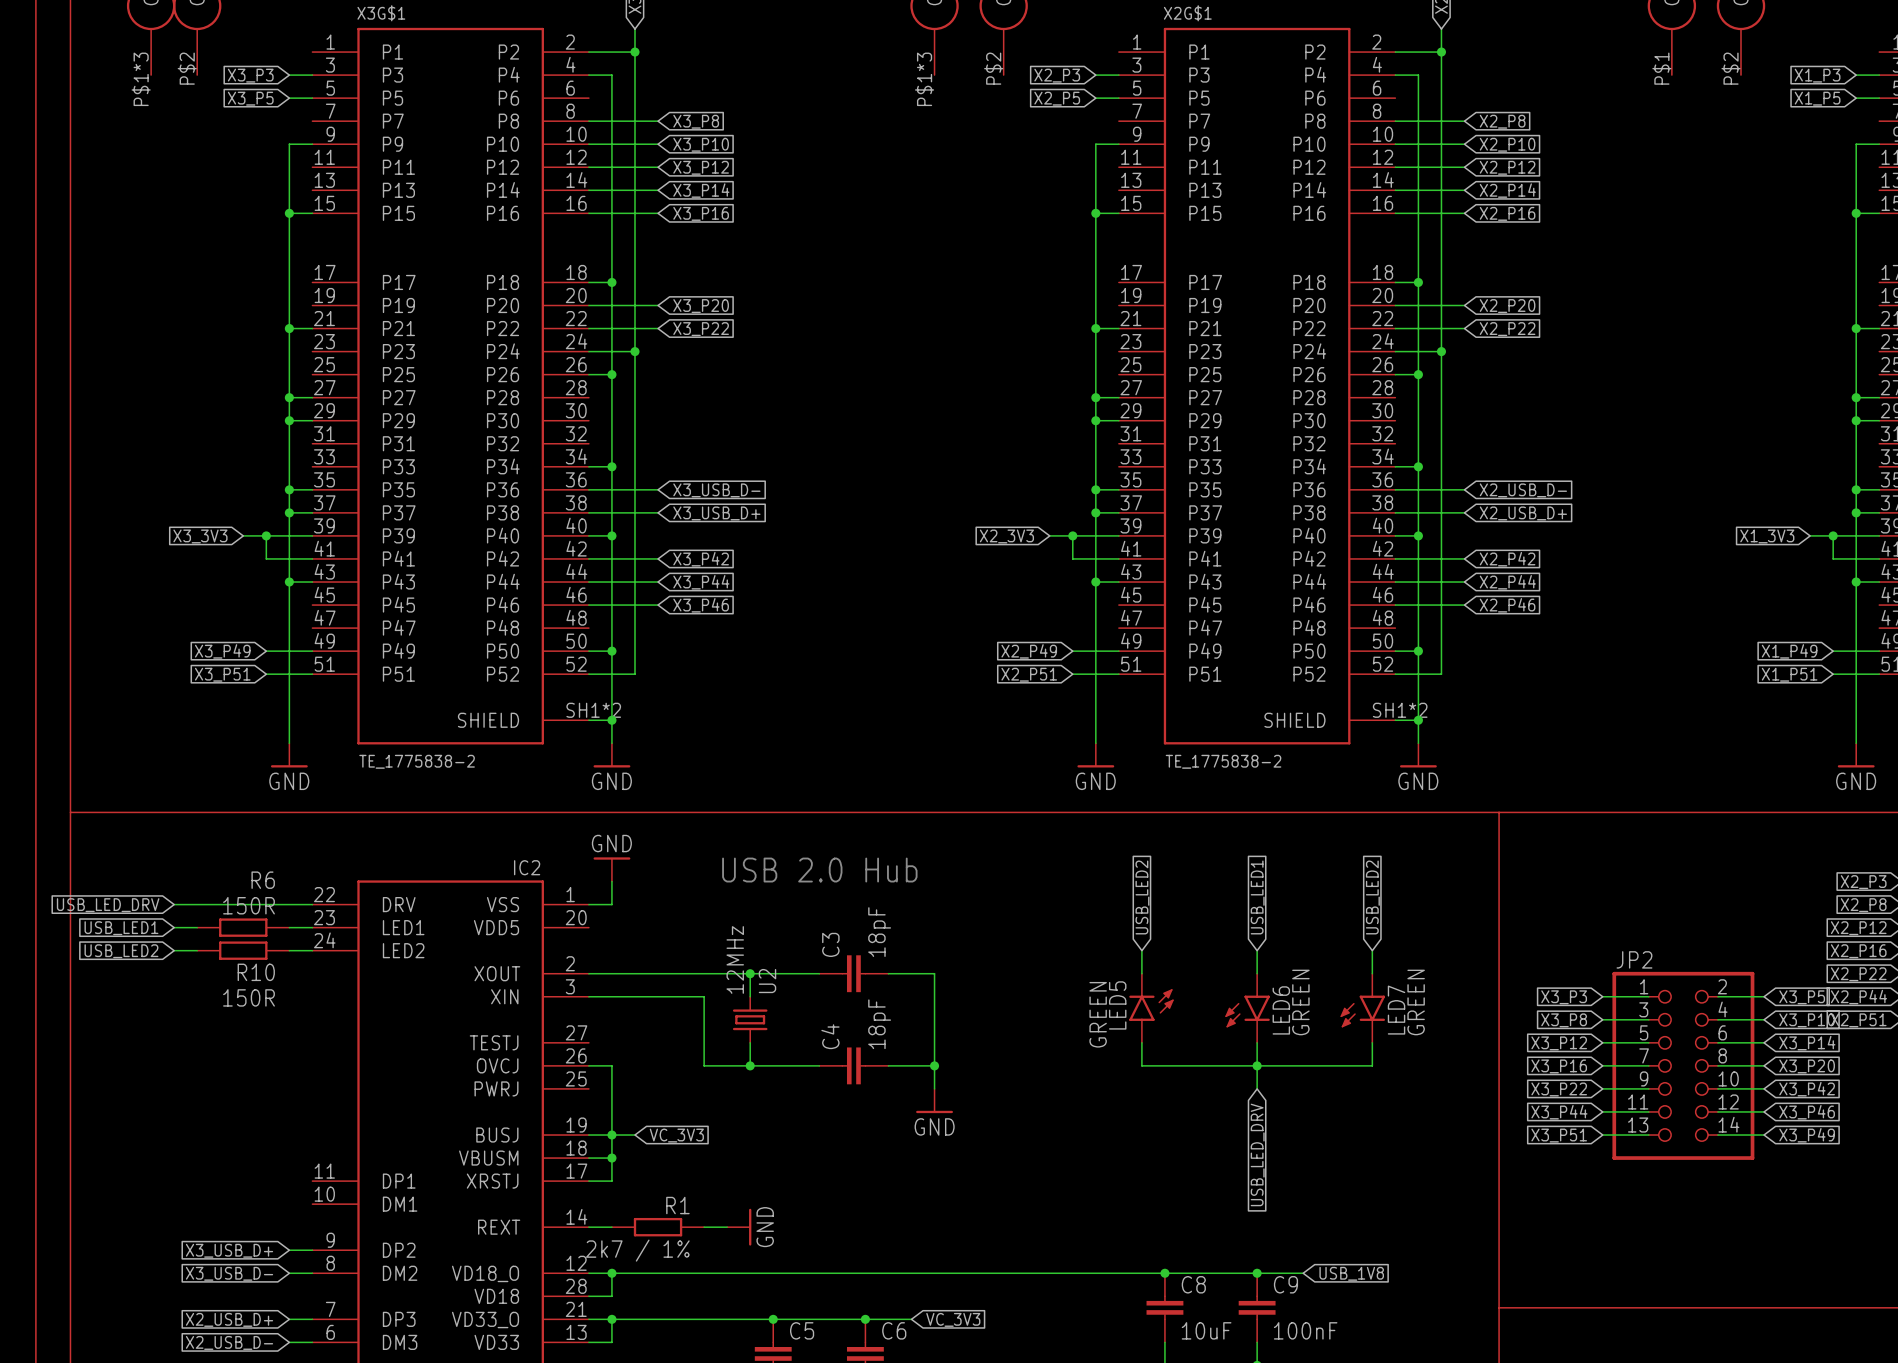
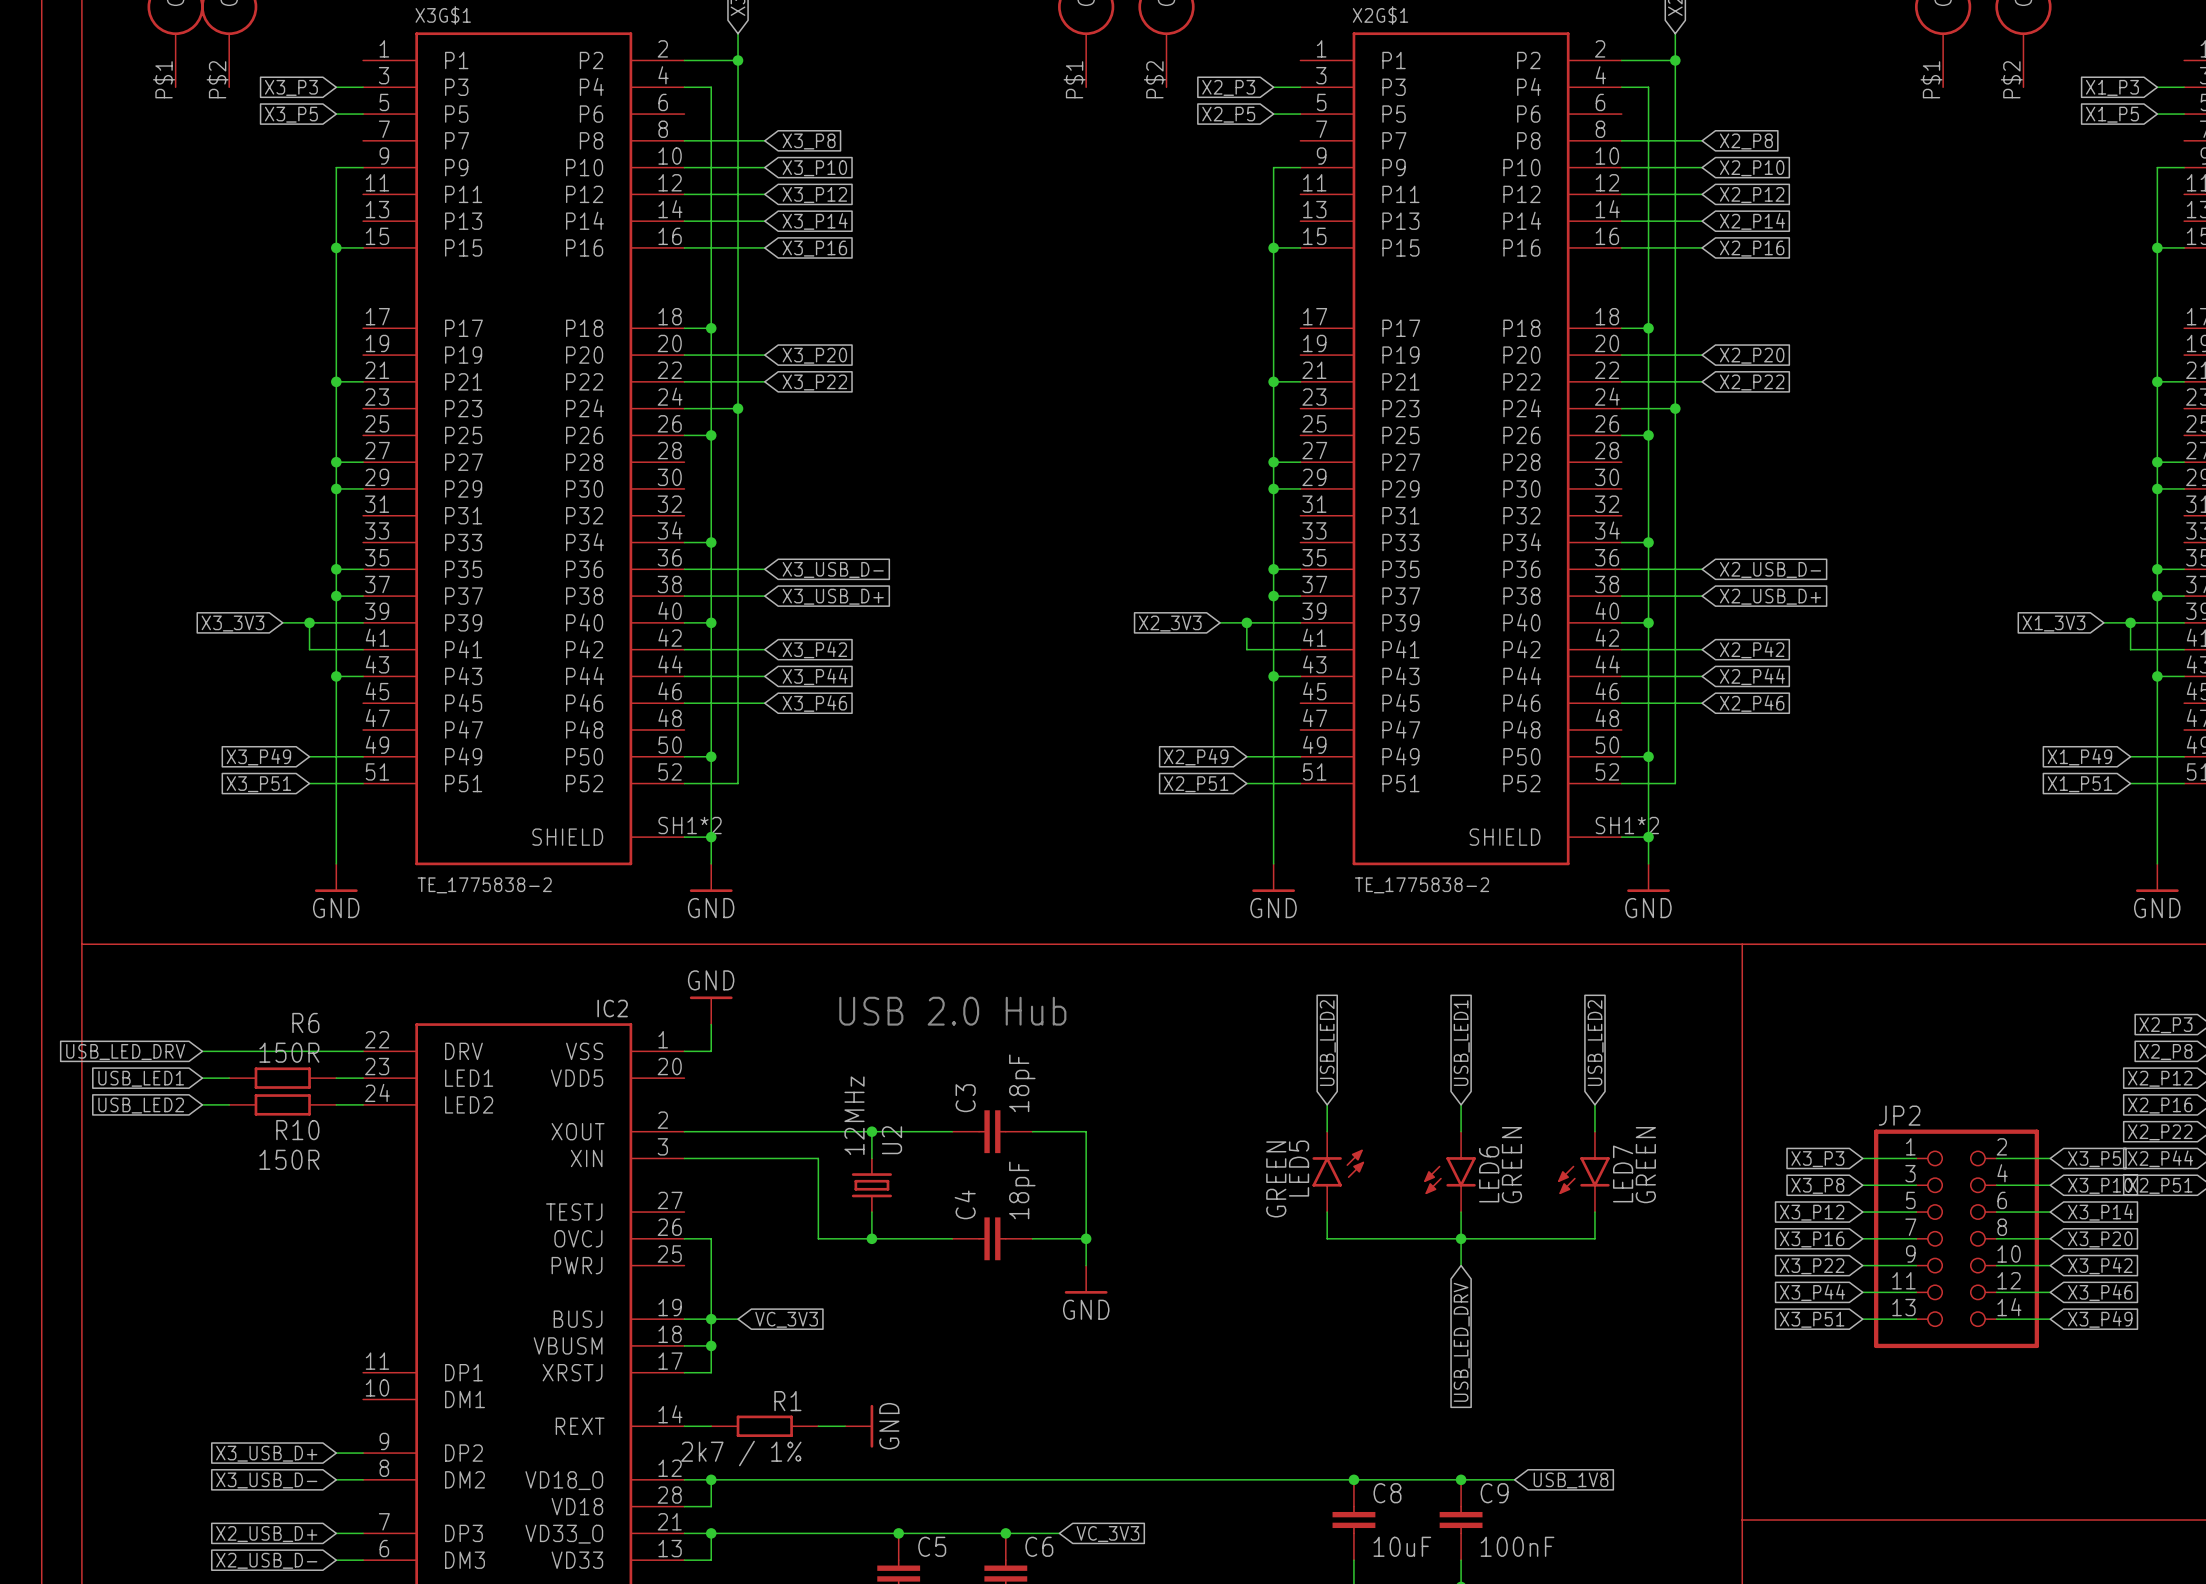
part pin number: P$1*3 (141, 79) -> P$1 (164, 79)
part pin number: P$1*3 (924, 79) -> P$1 (1074, 79)

